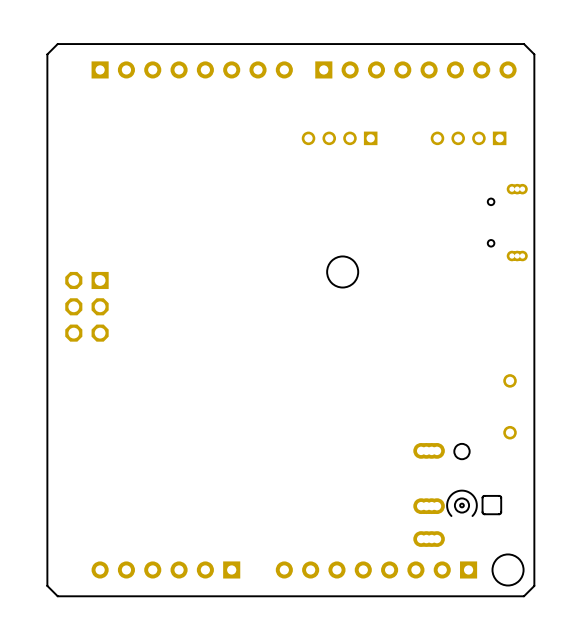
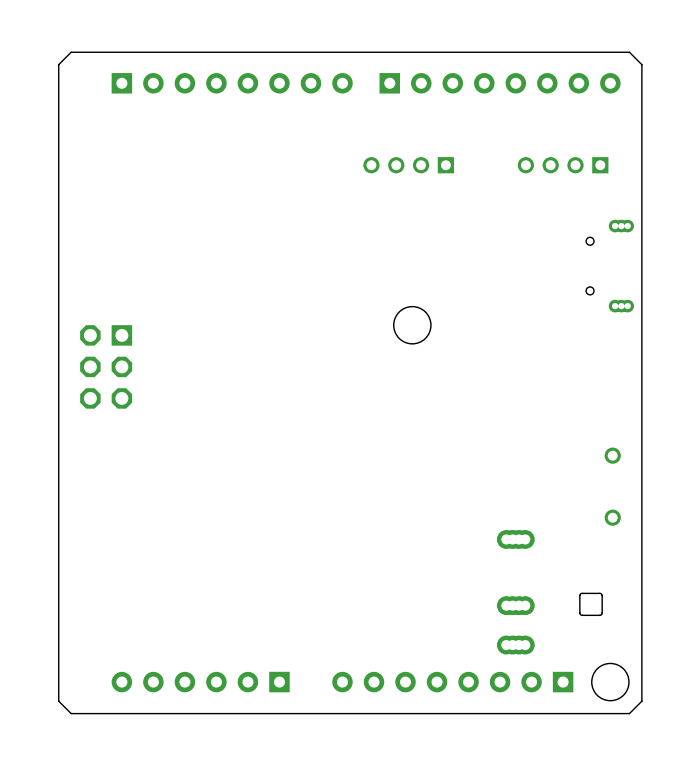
drawing: [453, 443, 471, 460] -> none
drawing: [454, 497, 470, 514] -> none
line: (472, 516) (476, 509) (475, 499) (471, 493) (461, 490) (452, 493) (448, 499) (447, 509) (451, 516) -> none

